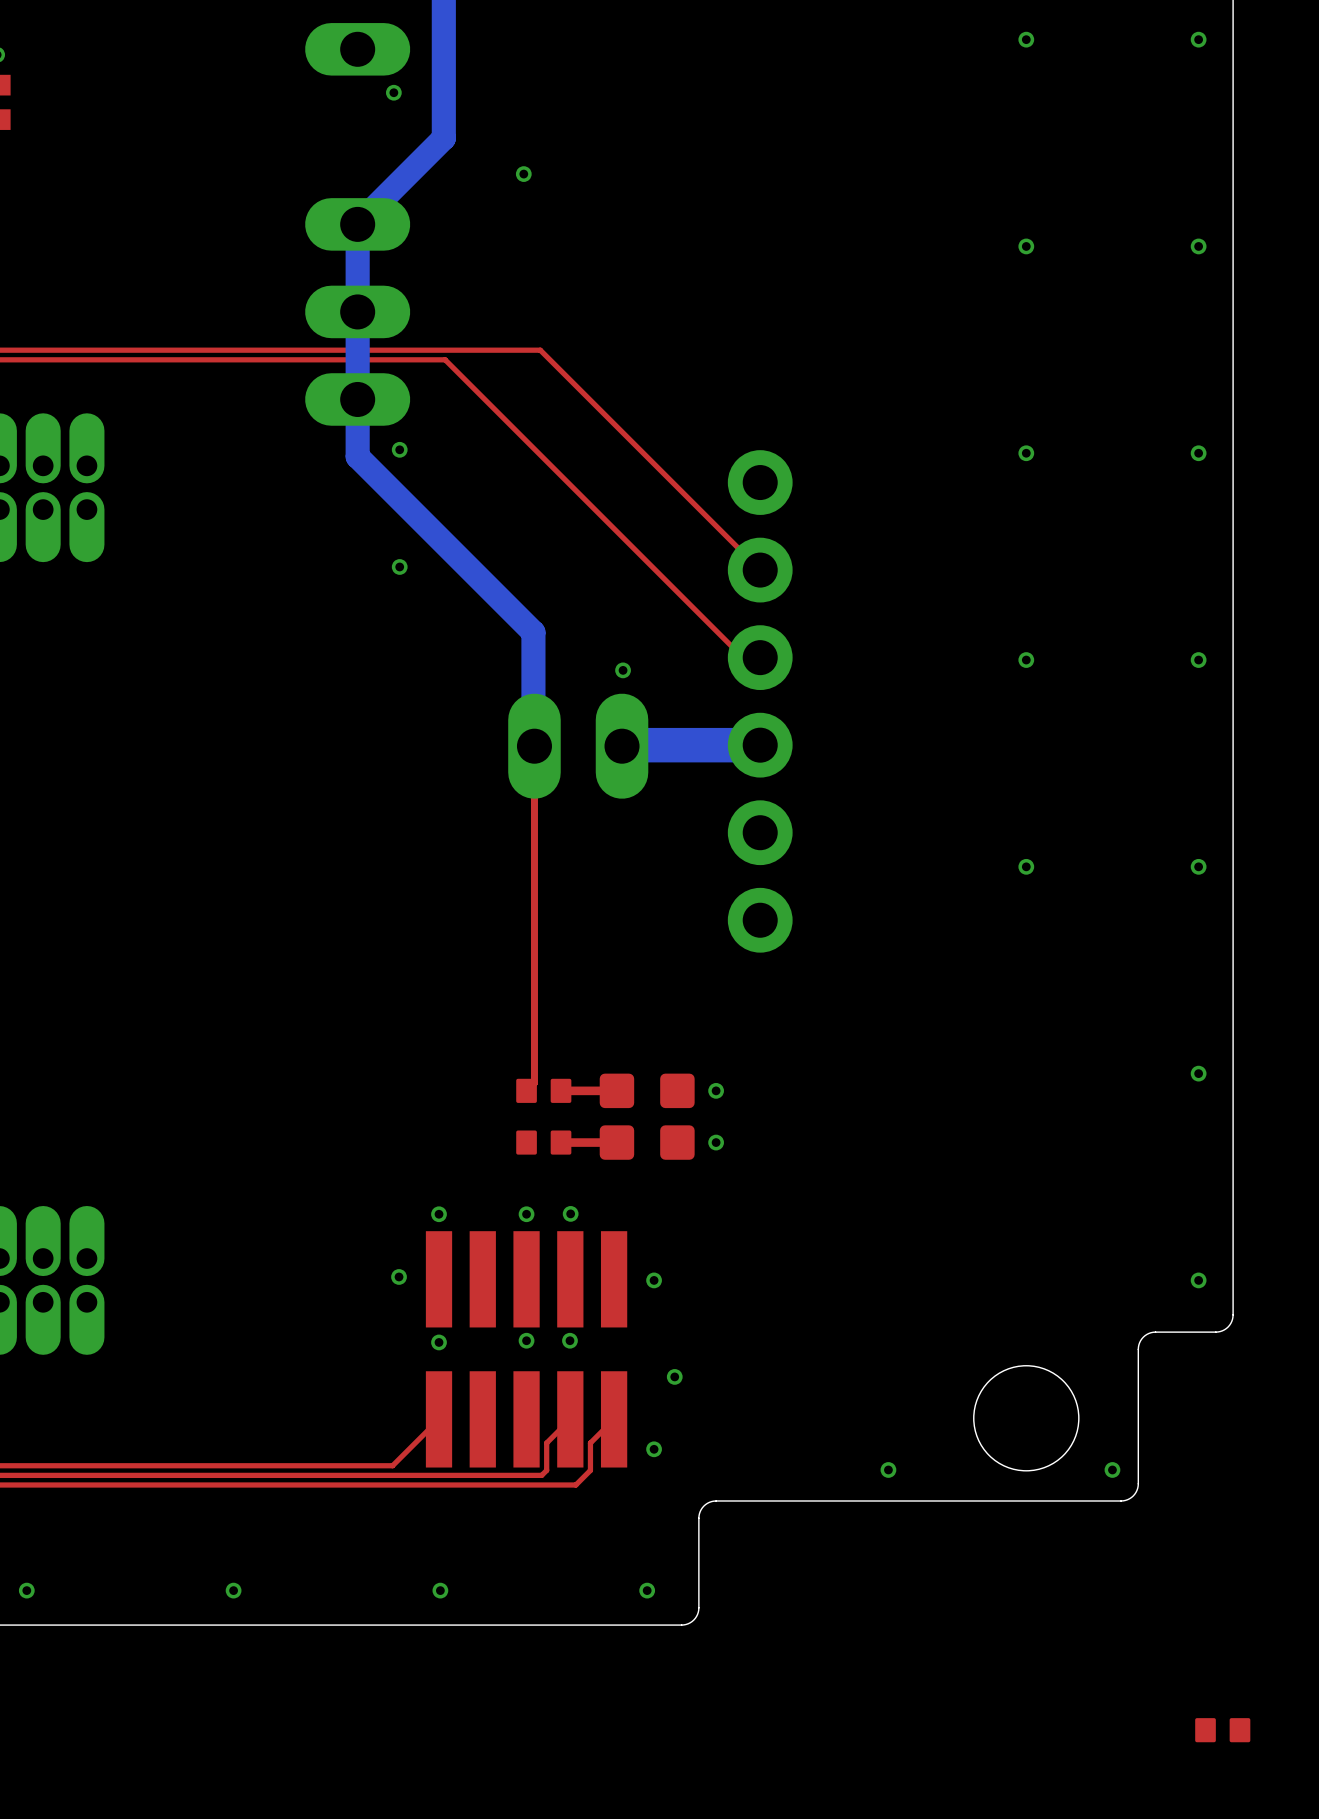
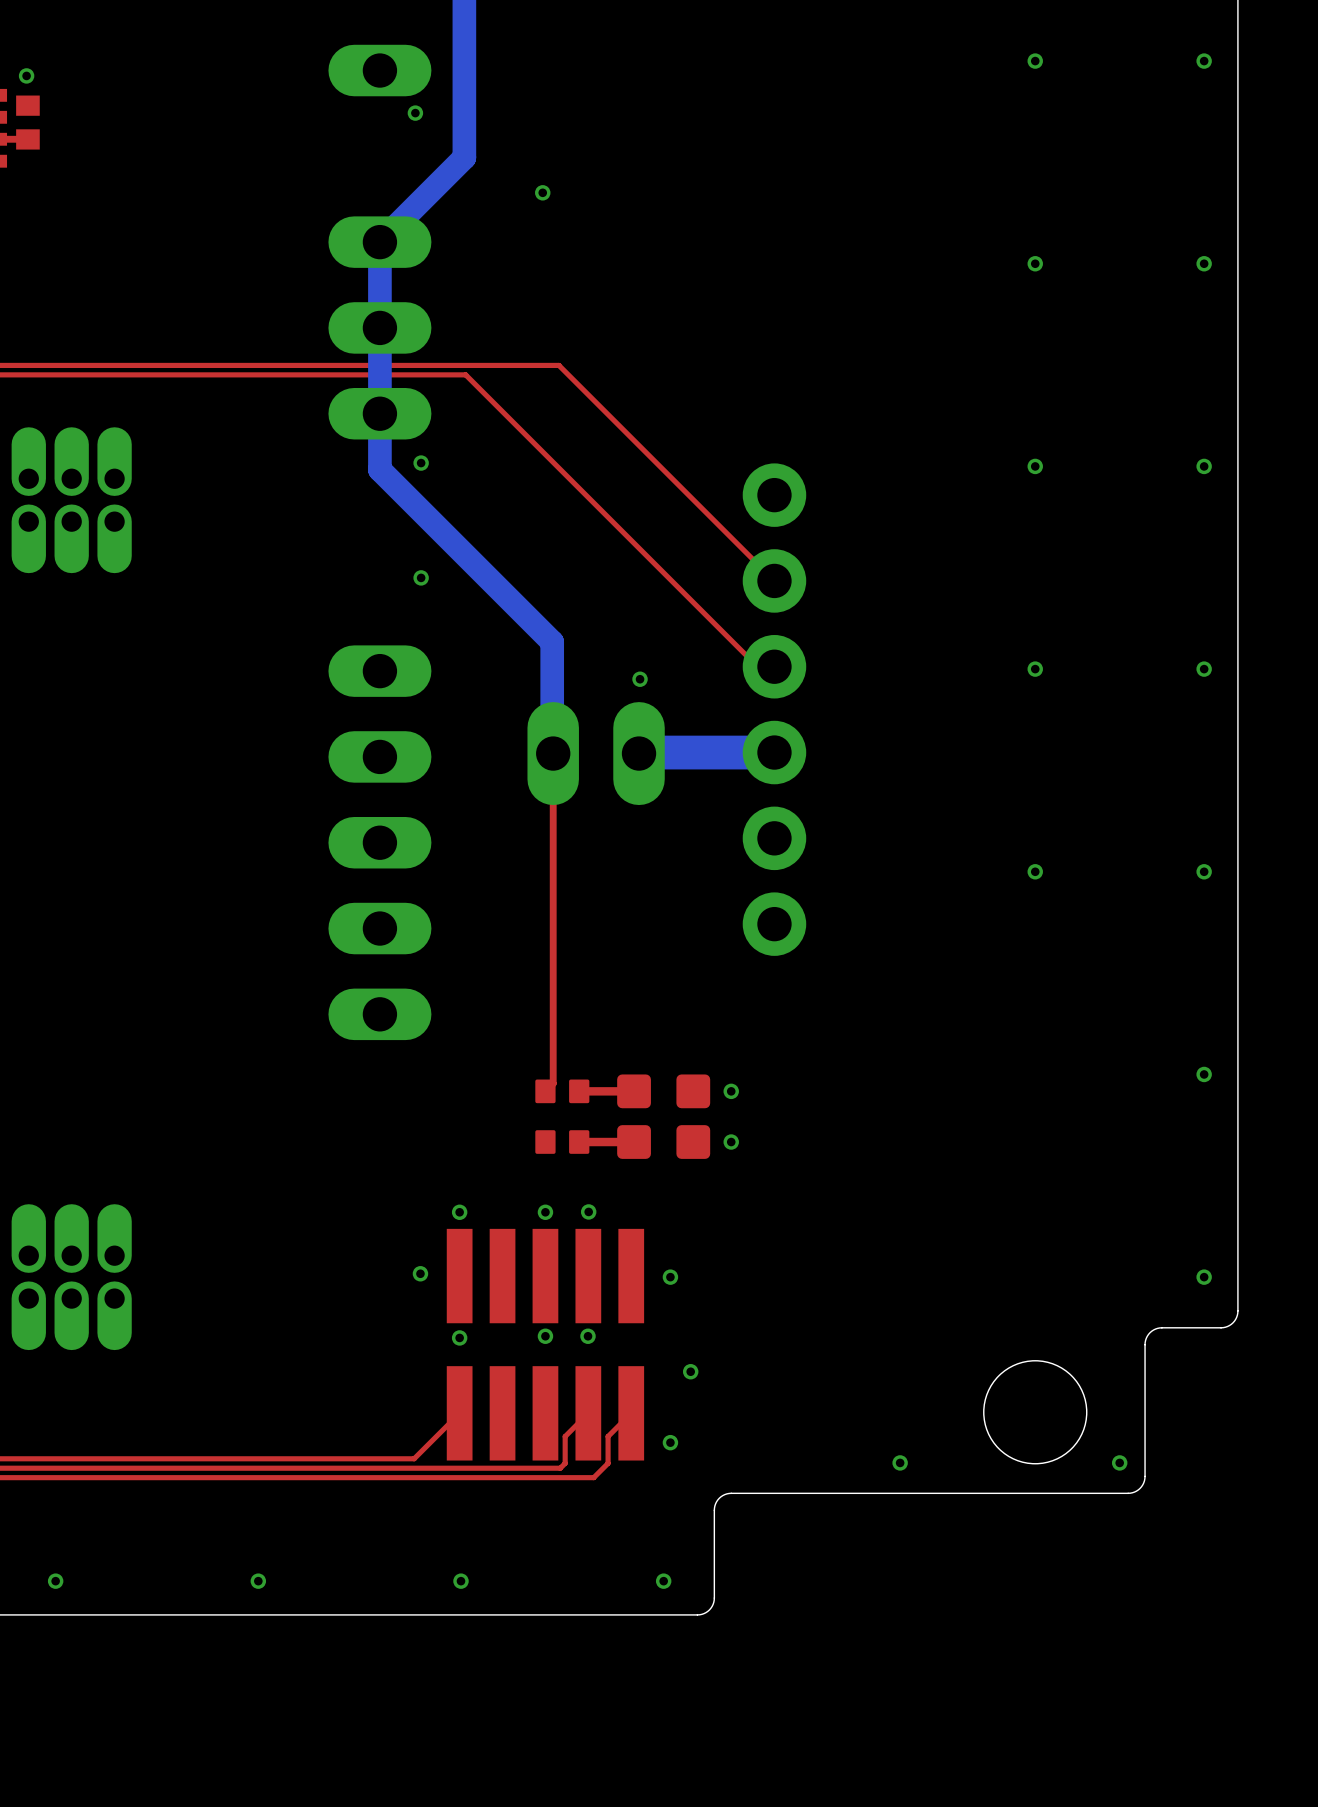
part: none -> (379, 842)
part: (1222, 1730) -> none

